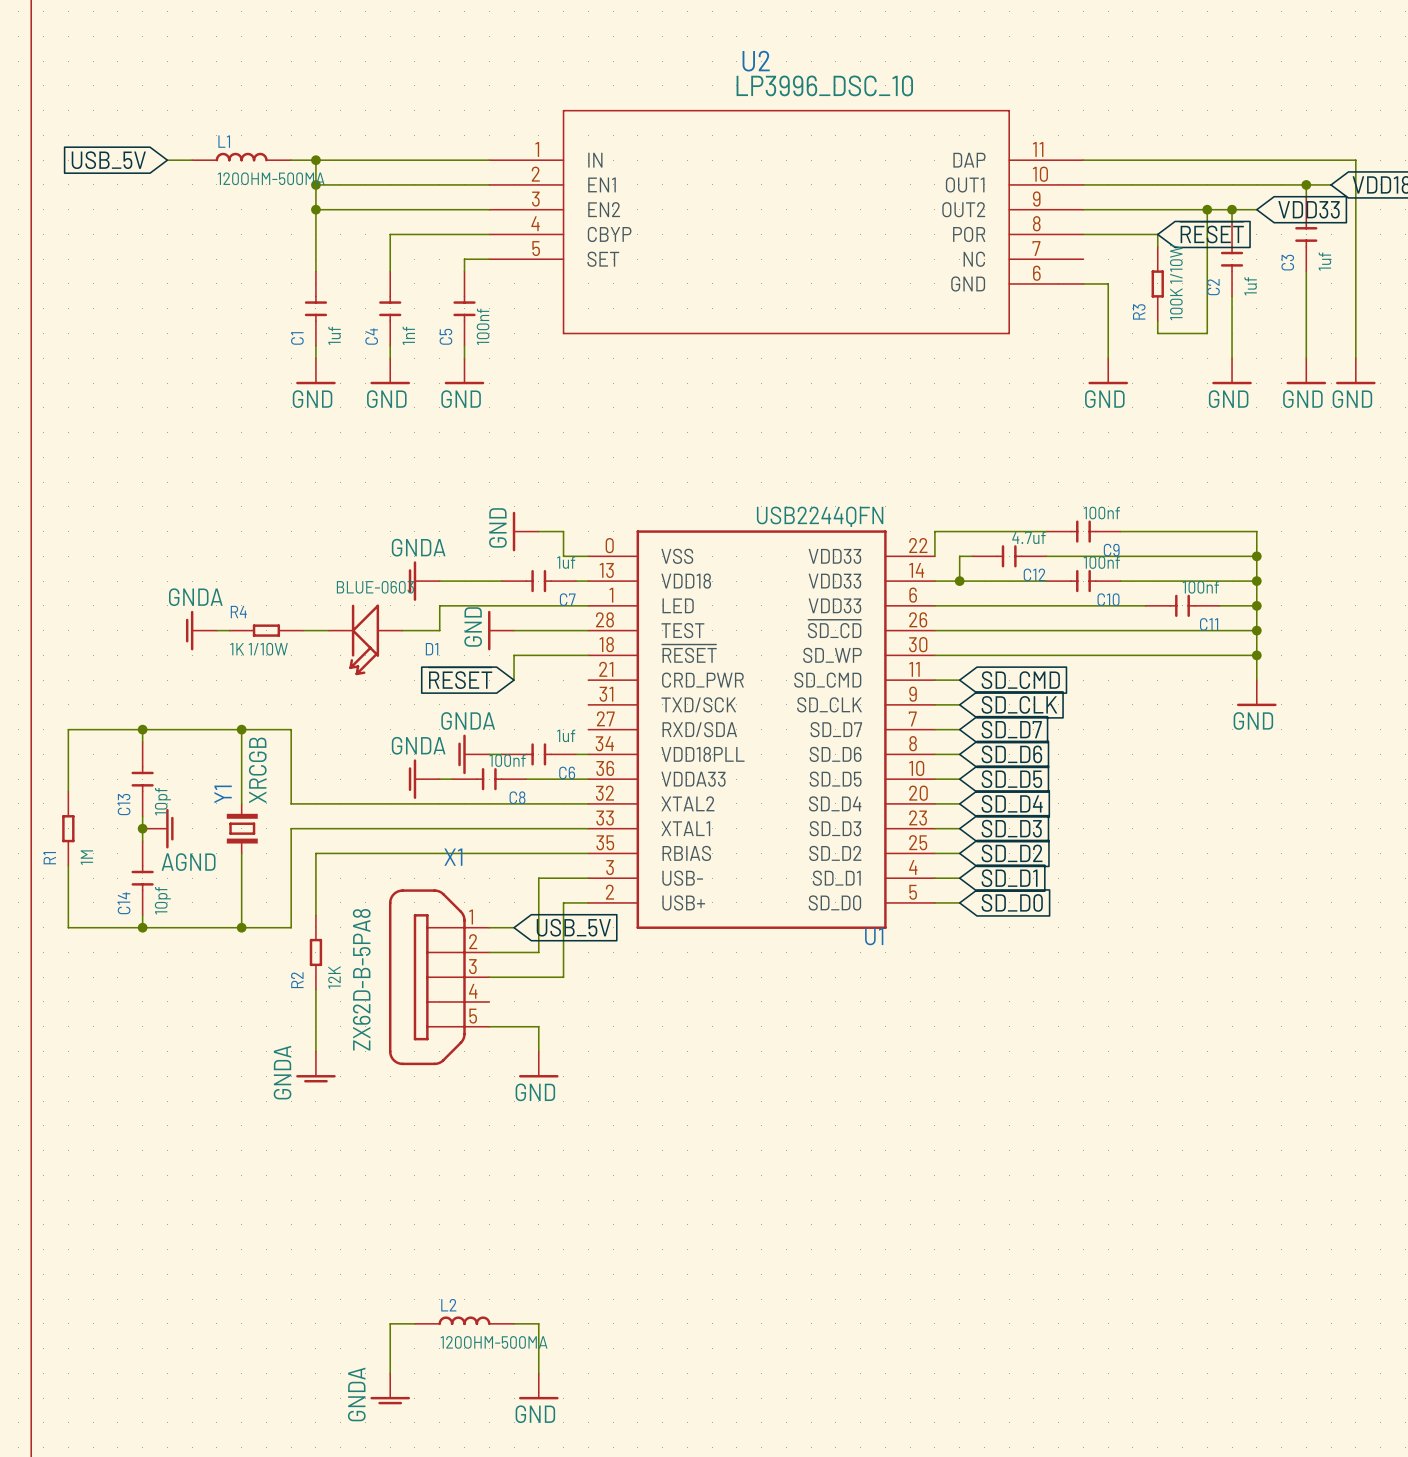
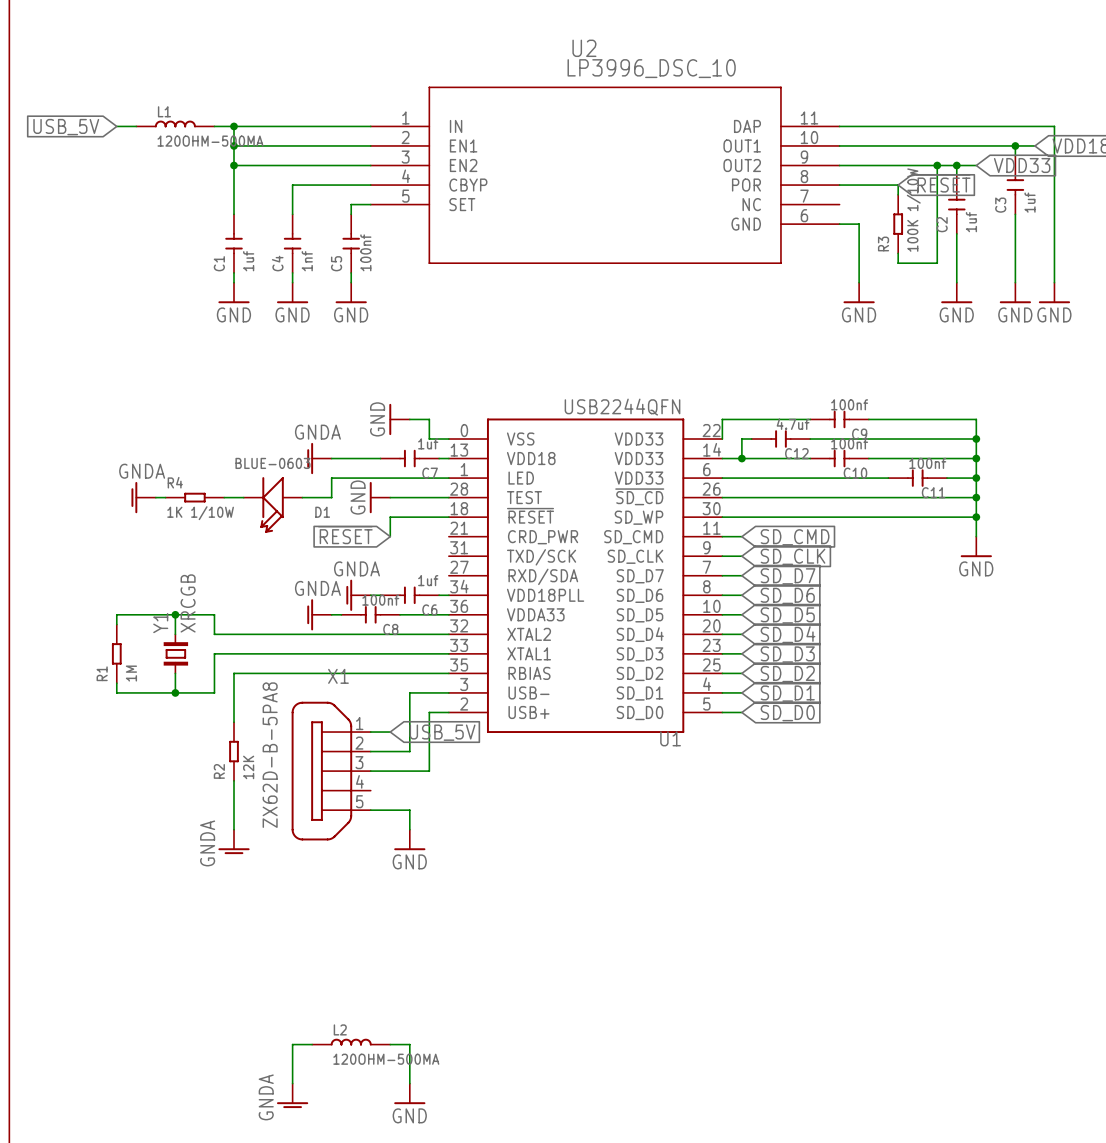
wire: (142, 729) (142, 742) -> none
junction: (142, 729) -> none
wire: (241, 729) (241, 779) -> none
junction position: (241, 729) -> (175, 614)
C13: 10pf (142, 779) -> none
wire: (291, 779) (291, 729) (68, 729) (68, 791) -> (214, 614) (116, 614) (116, 624)
wire: (142, 816) (142, 841) -> none
R1 position: (68, 828) -> (116, 653)
junction: (142, 828) -> none
power symbol: AGND (158, 828) -> none
wire: (68, 865) (68, 927) (291, 927) (291, 878) -> (116, 683) (116, 692) (214, 692)
C14: 10pf (142, 878) -> none
wire: (241, 878) (241, 927) -> none
wire: (142, 915) (142, 927) -> none
junction: (142, 927) -> none
junction position: (241, 927) -> (175, 692)

